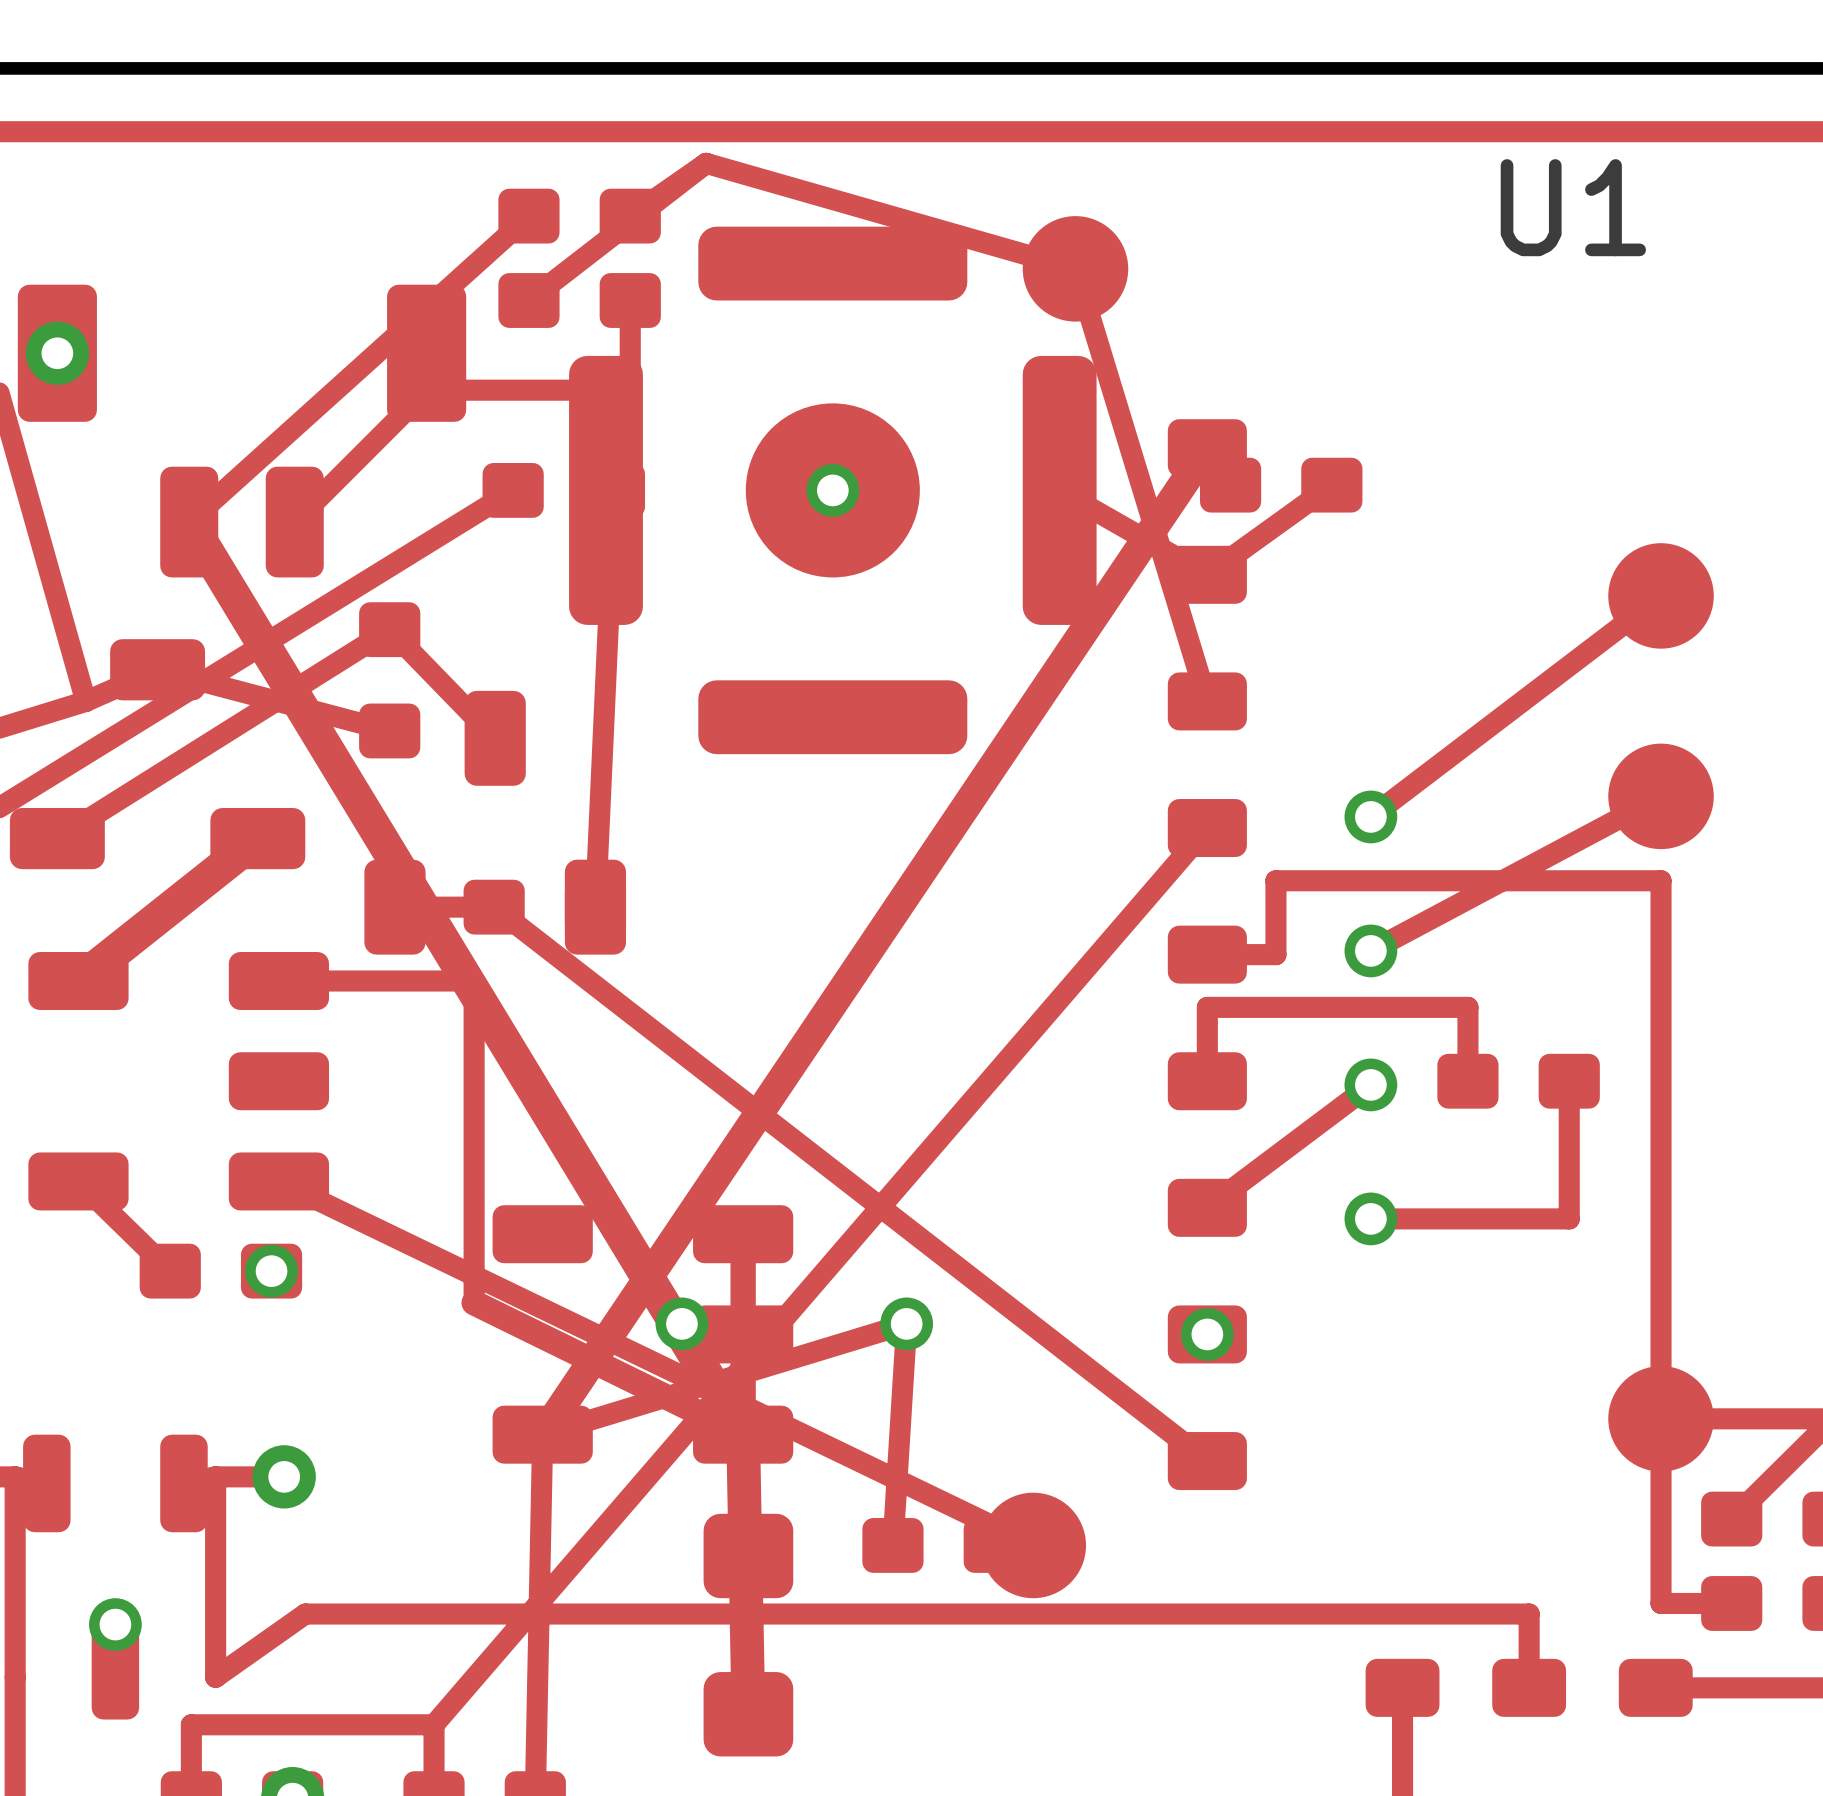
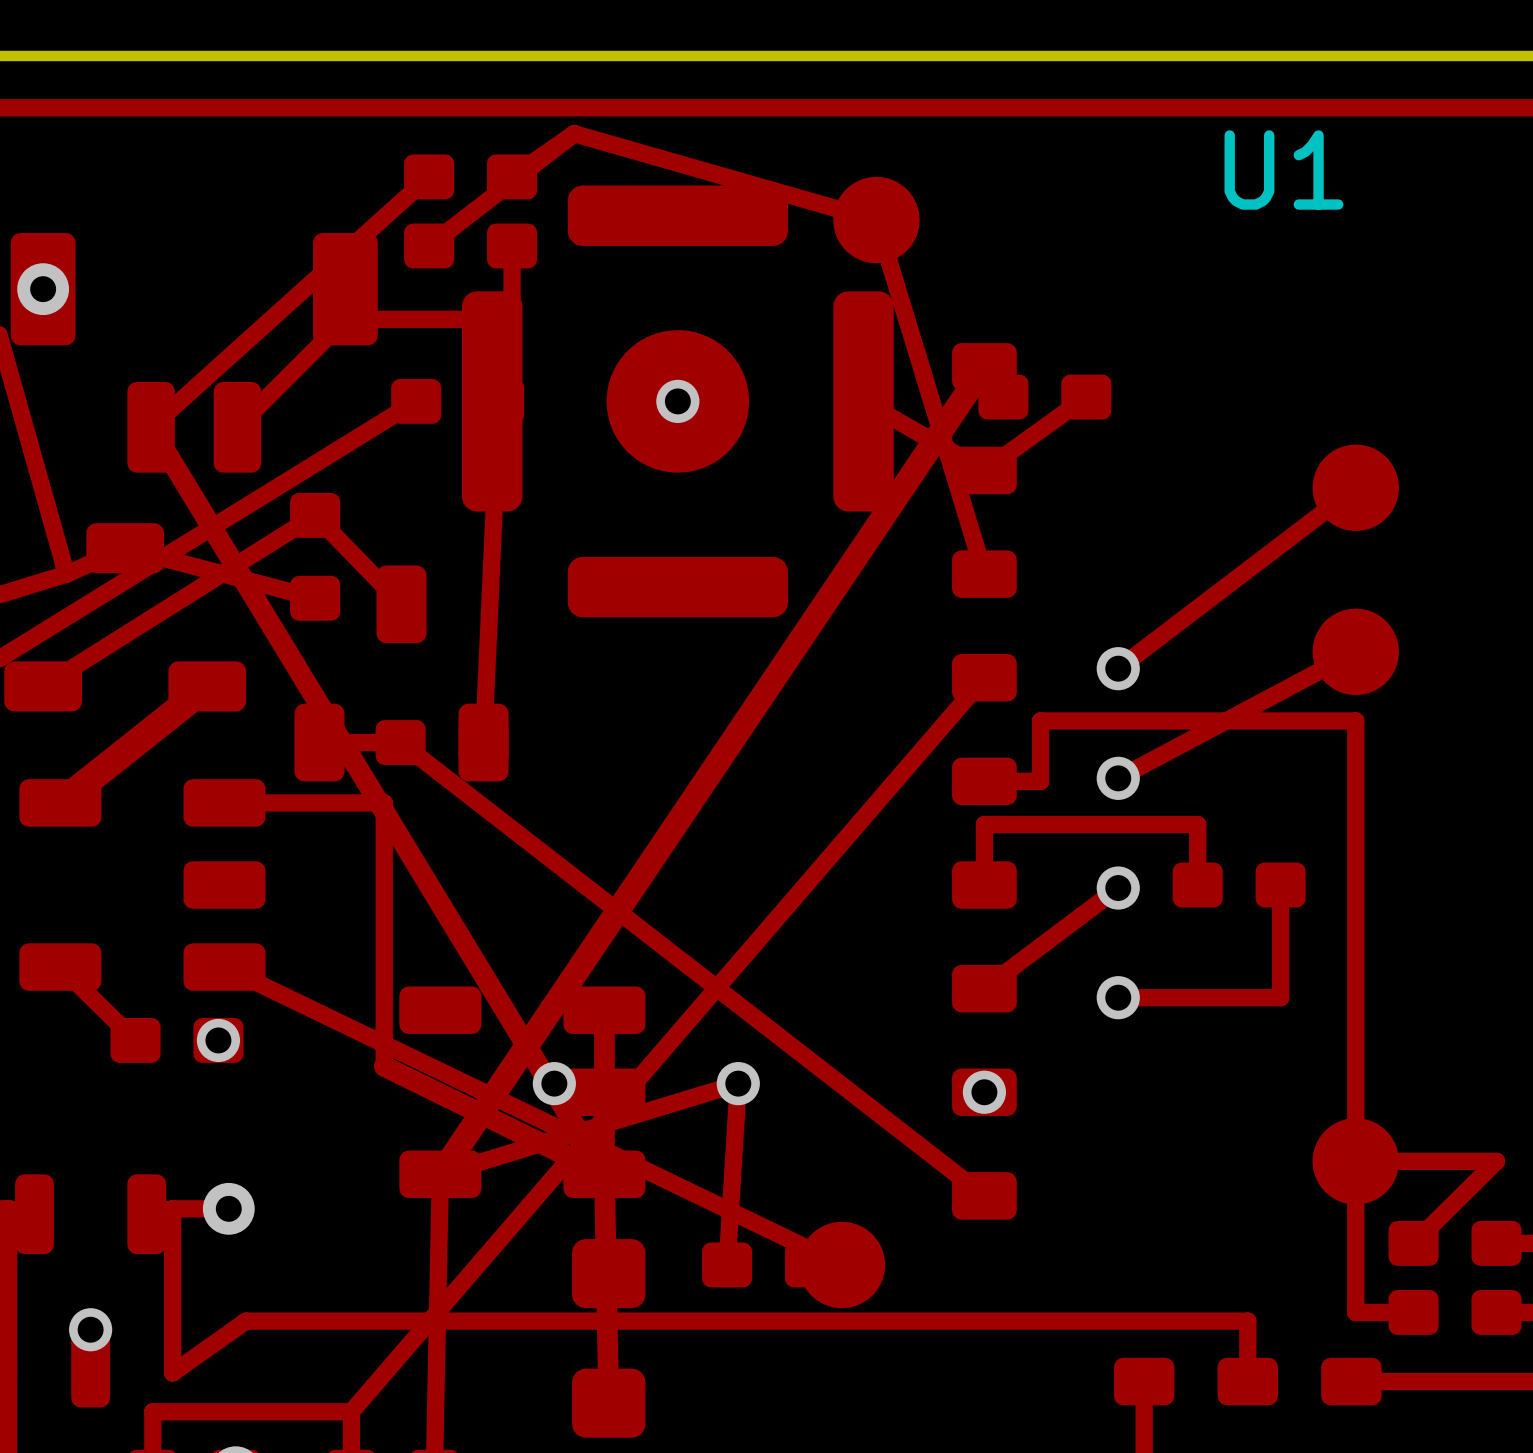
track width: thick (189, 522) (743, 1434) (748, 1714) -> thin (151, 427) (604, 1174) (608, 1403)

